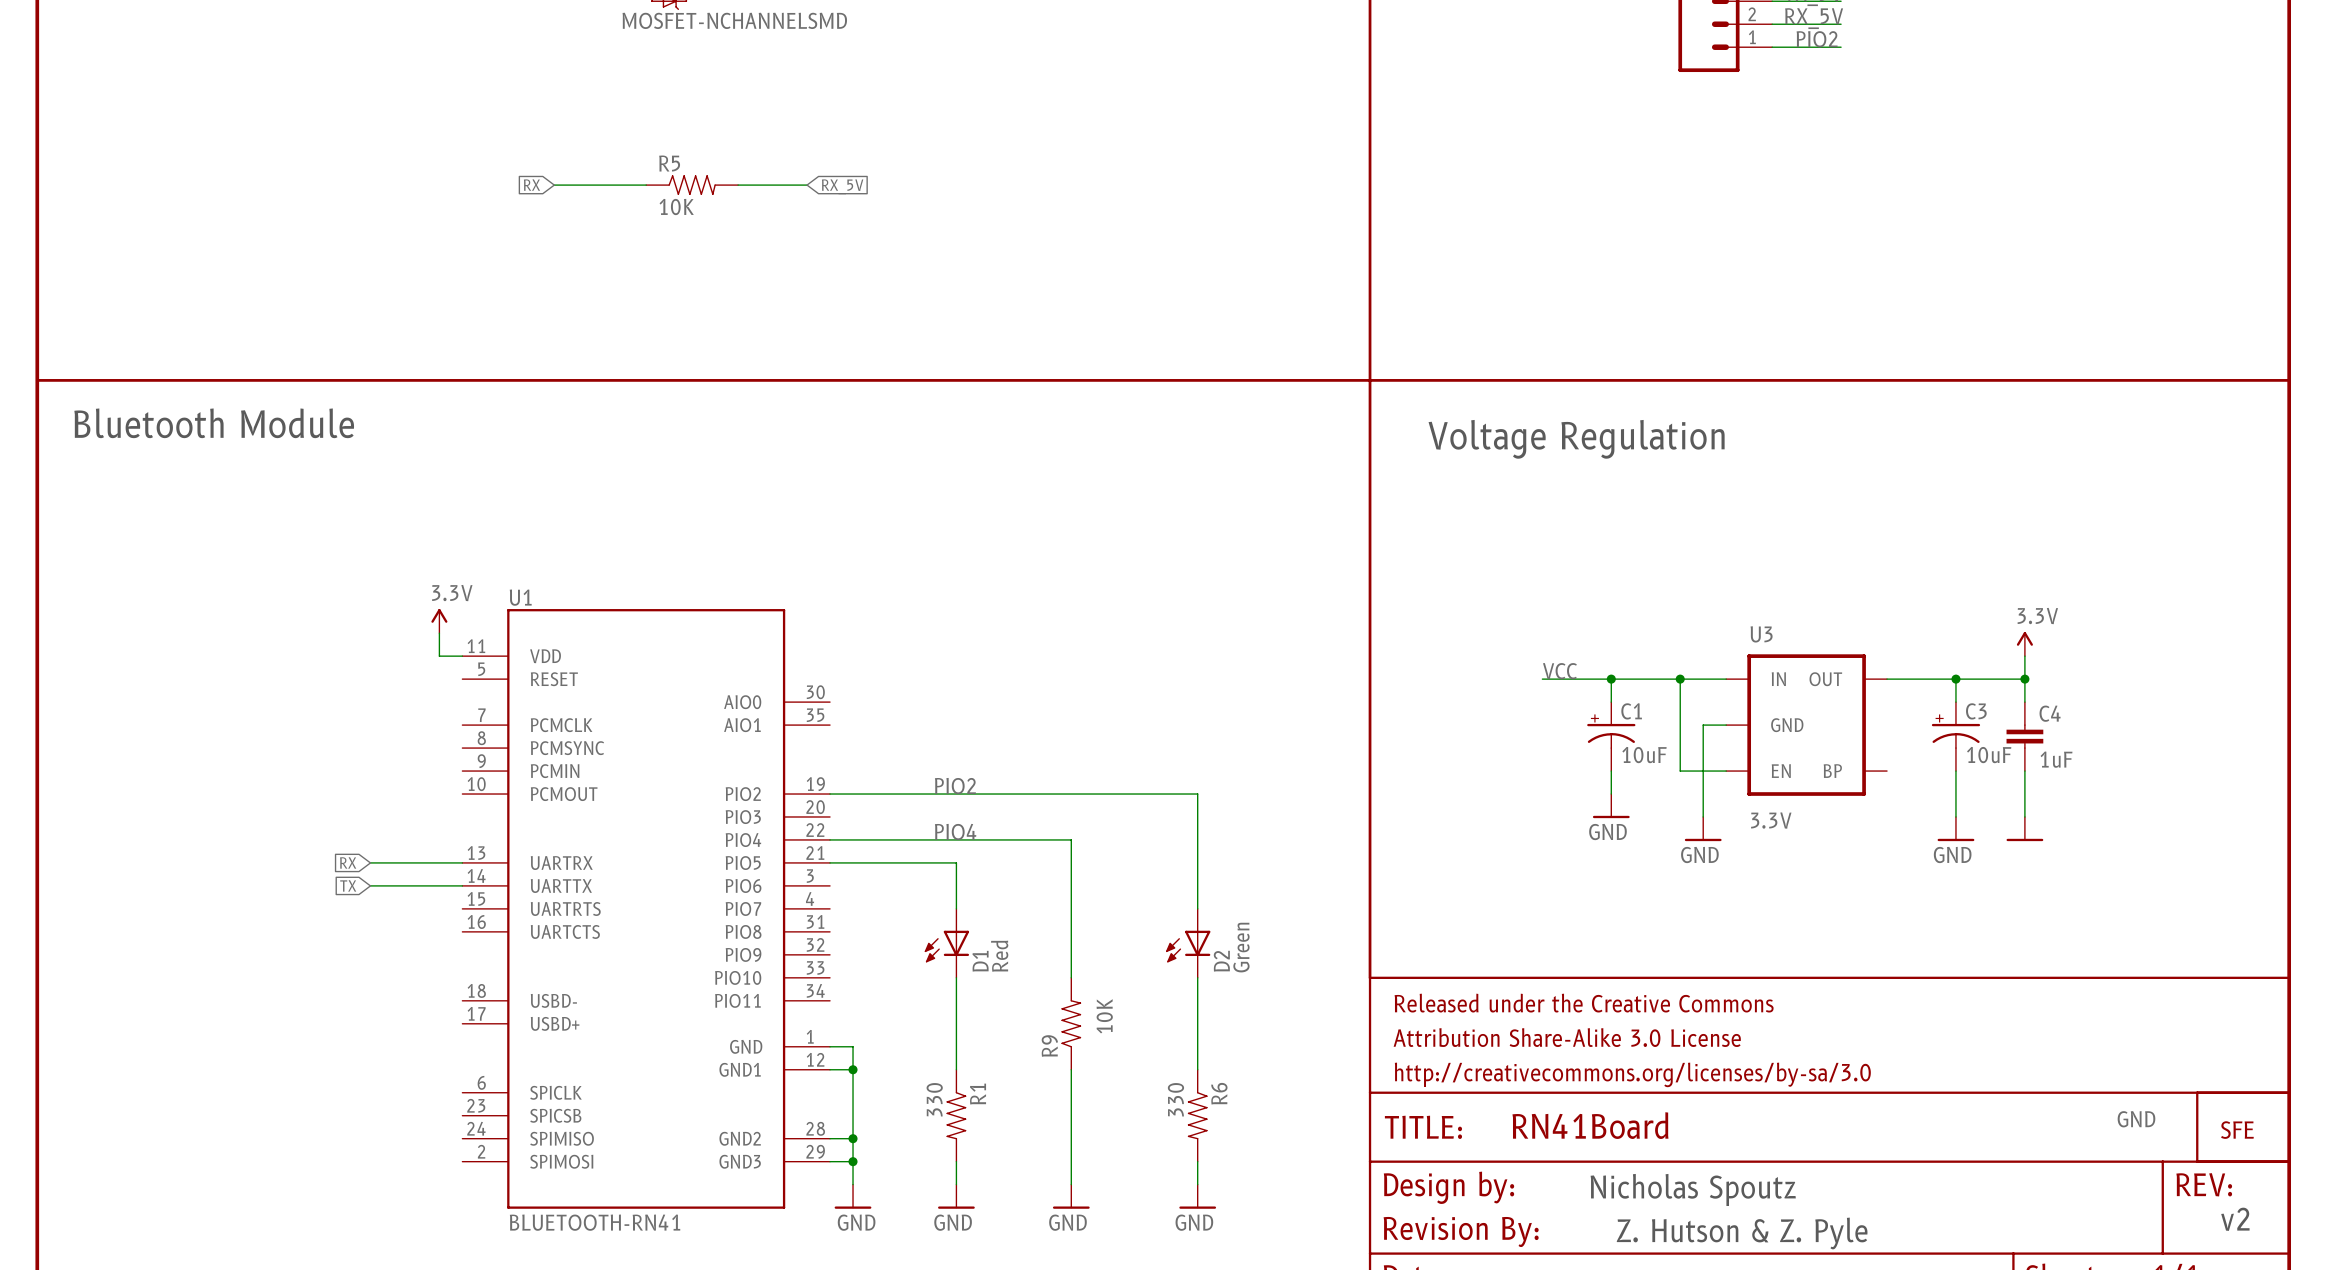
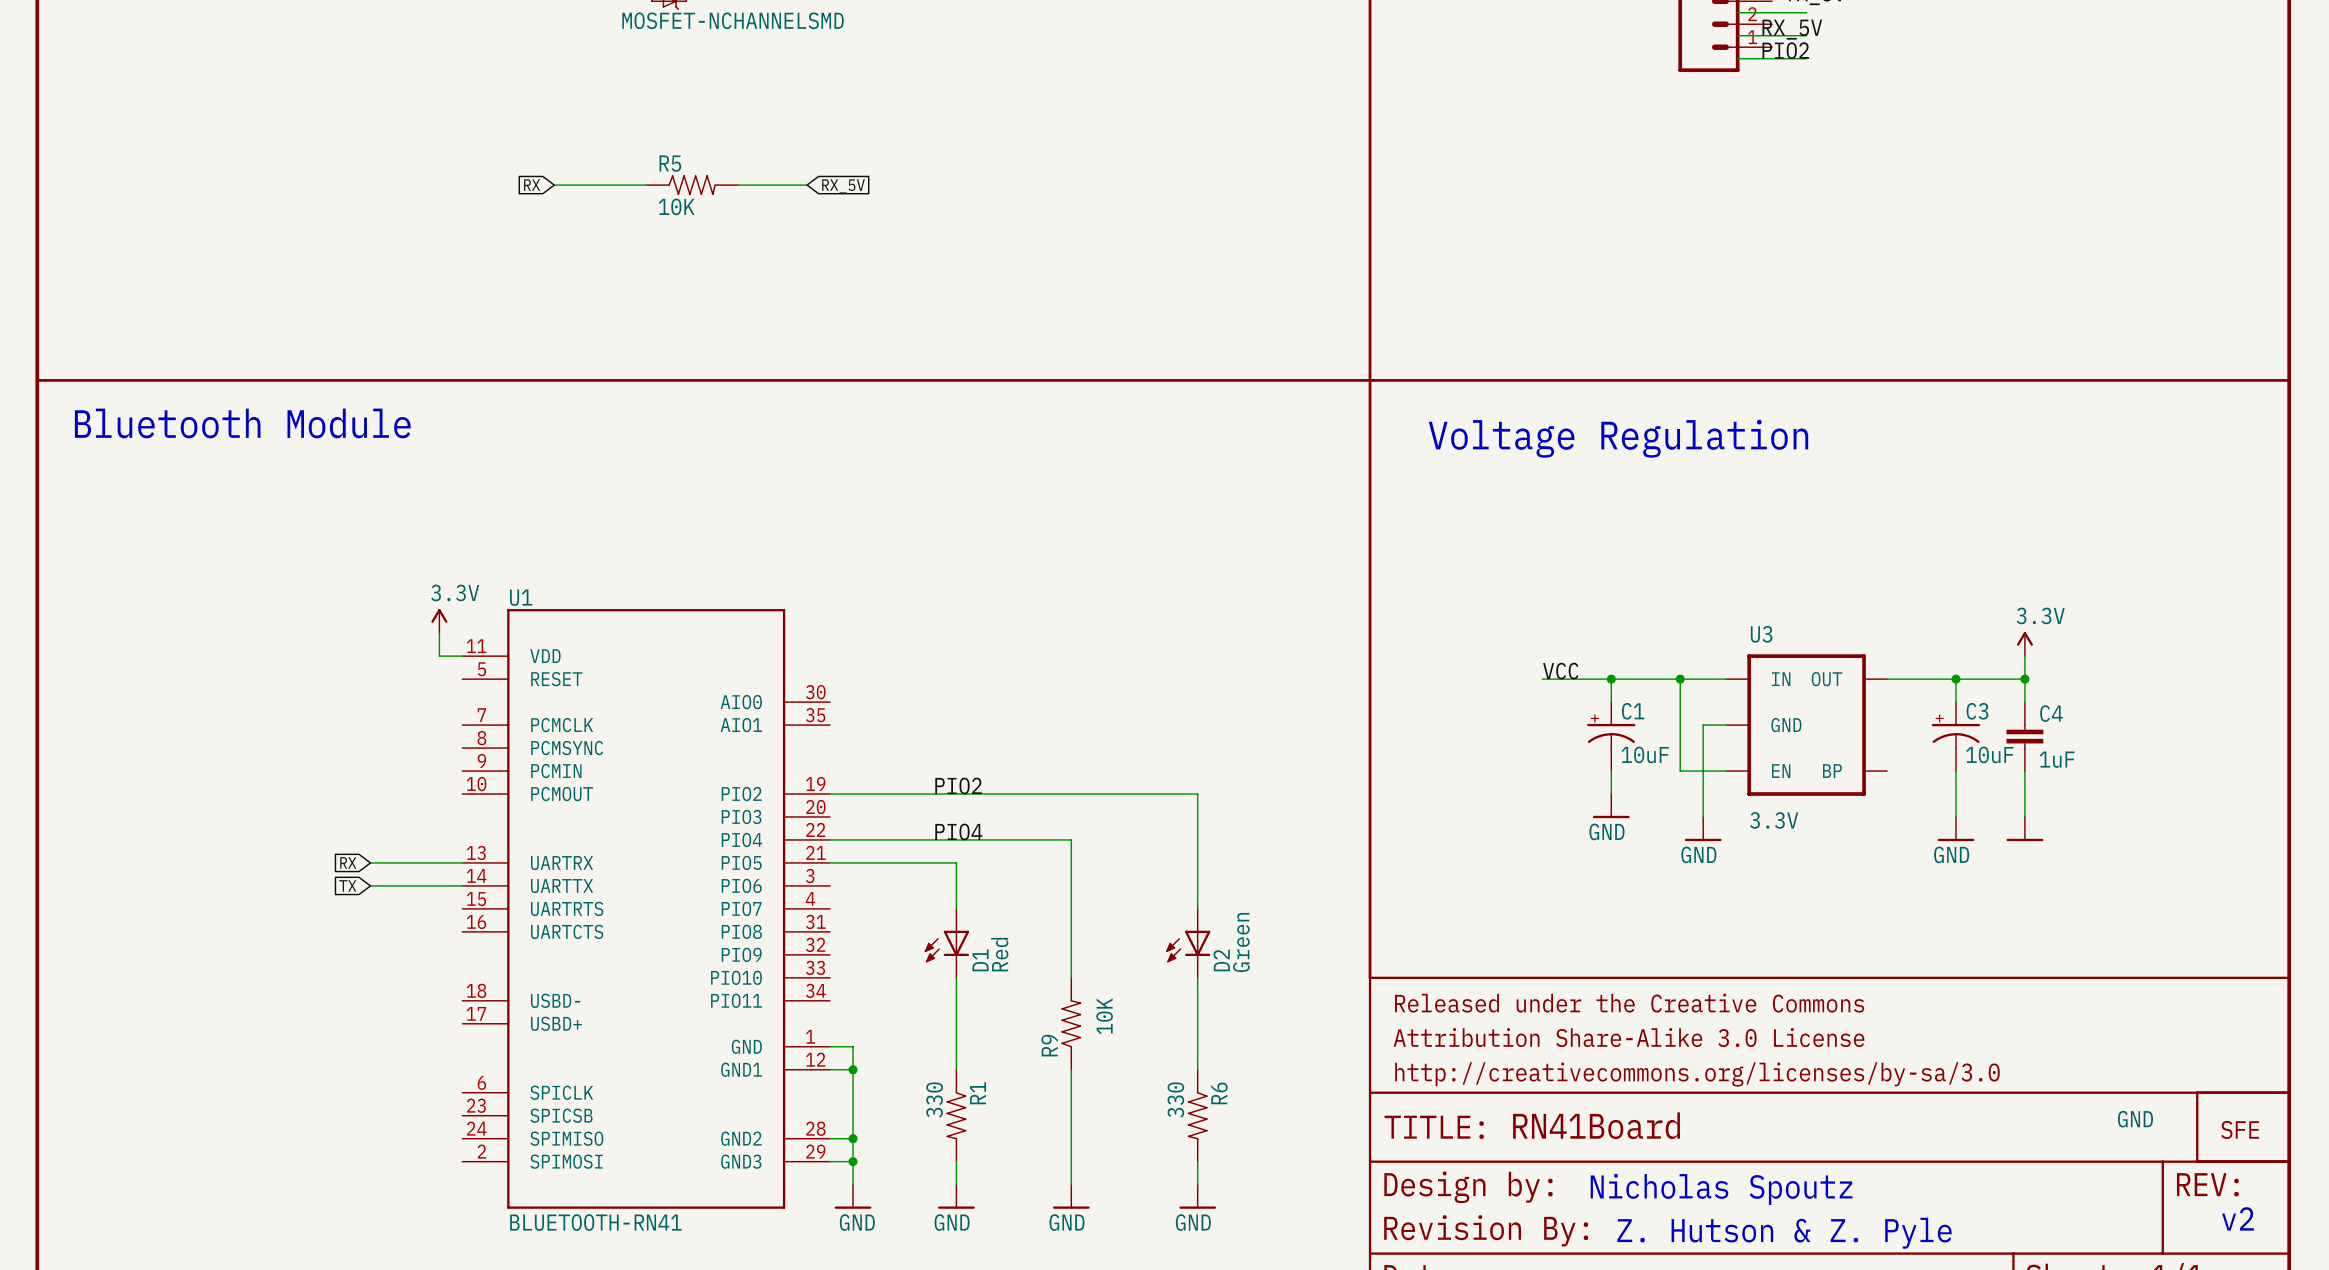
wire: (1772, 1) (1841, 1) -> (1737, 12) (1806, 12)
label position: RX_5V (1814, 18) -> RX_5V (1792, 29)
wire: (1772, 24) (1841, 24) -> (1737, 35) (1806, 35)
label position: PIO2 (1817, 39) -> PIO2 (1785, 50)
wire: (1772, 47) (1841, 47) -> (1737, 58) (1806, 58)

